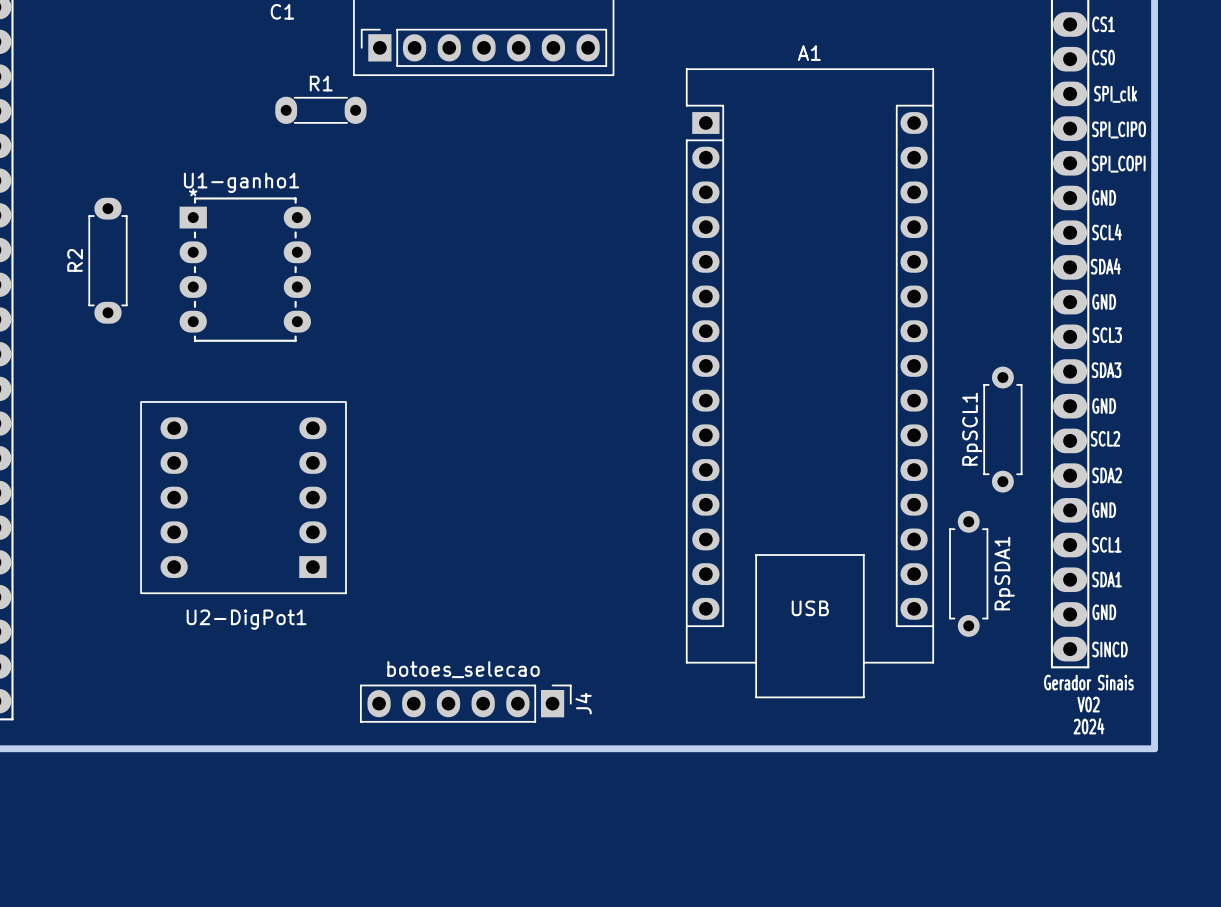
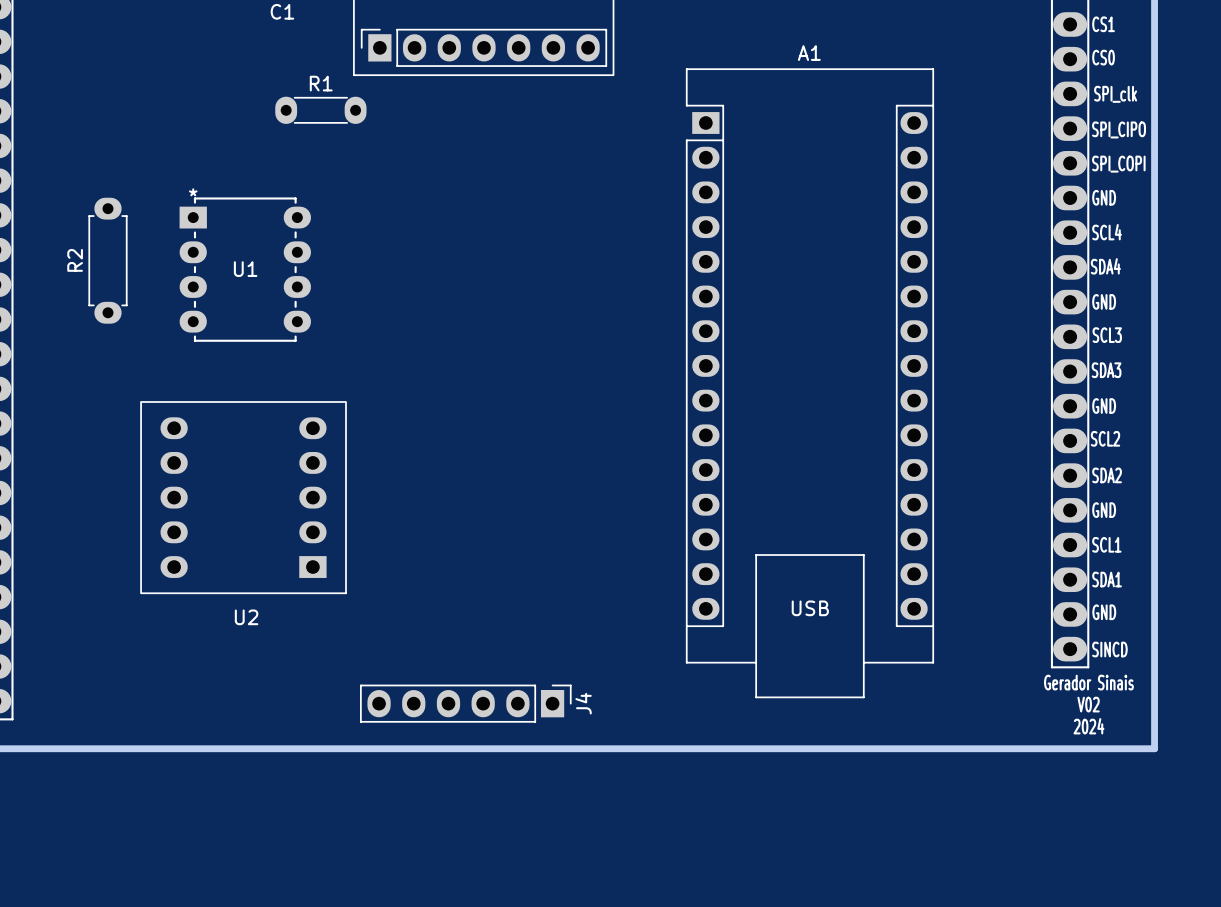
U1-ganho1 name: U1-ganho1 (241, 182) -> U1 (245, 269)
RpSCL1: (1002, 429) -> none
RpSDA1: (968, 573) -> none
U2-DigPot1 name: U2-DigPot1 (246, 619) -> U2 (246, 617)
J4 value: botoes_selecao (463, 669) -> none

